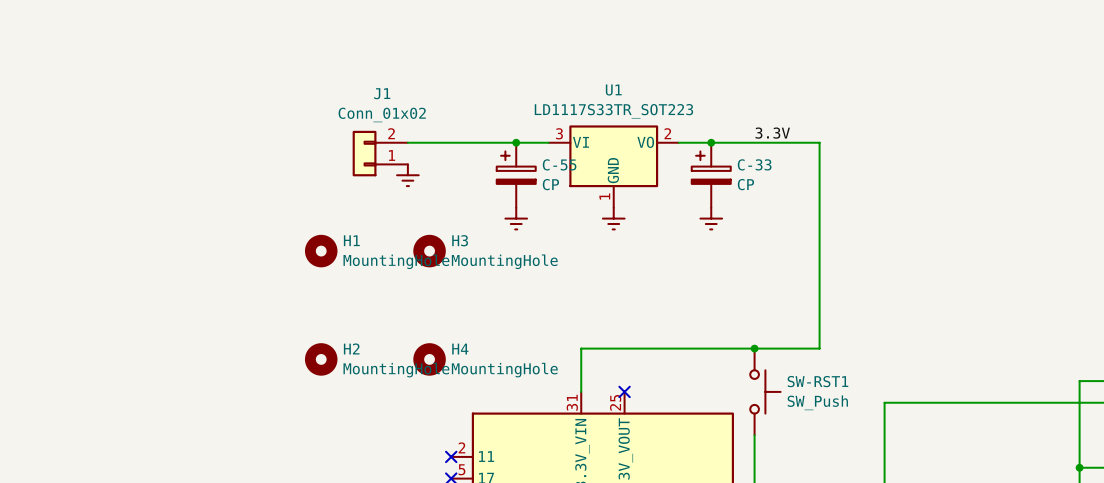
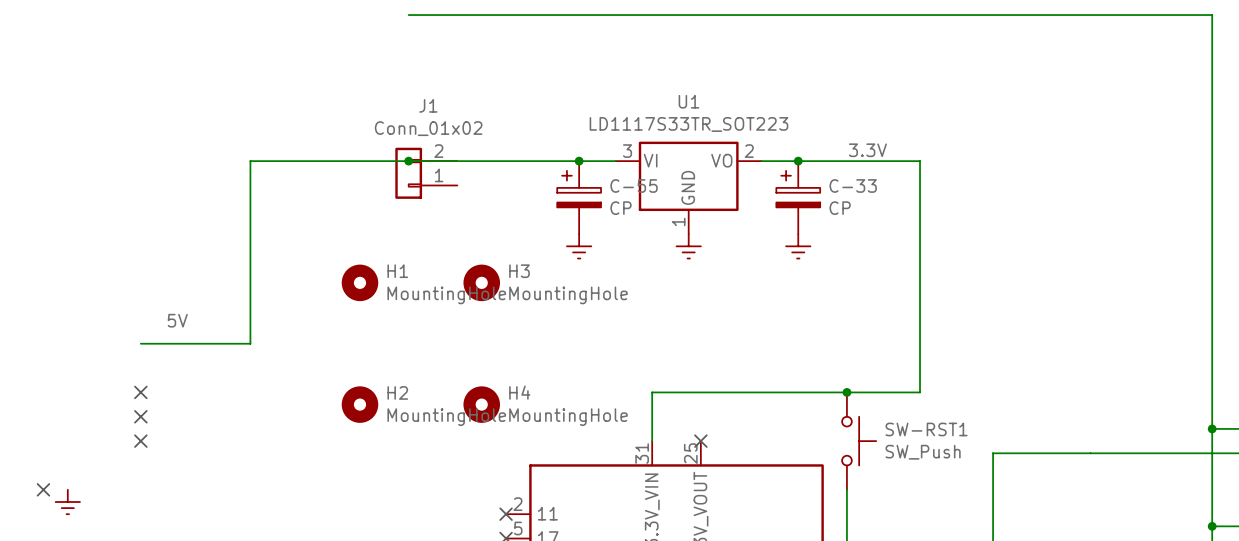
wire: none -> (408, 15) (1212, 15) (1212, 428)
junction: none -> (408, 161)
wire: none -> (457, 161) (250, 161) (250, 343) (140, 343)
power symbol: (407, 175) -> none
label: none -> 5V (177, 320)
no-connect mark: none -> (140, 392)
no-connect mark: none -> (140, 416)
junction: none -> (1212, 428)
no-connect mark: none -> (140, 441)
no-connect mark: none -> (43, 489)
power symbol: none -> (67, 502)

